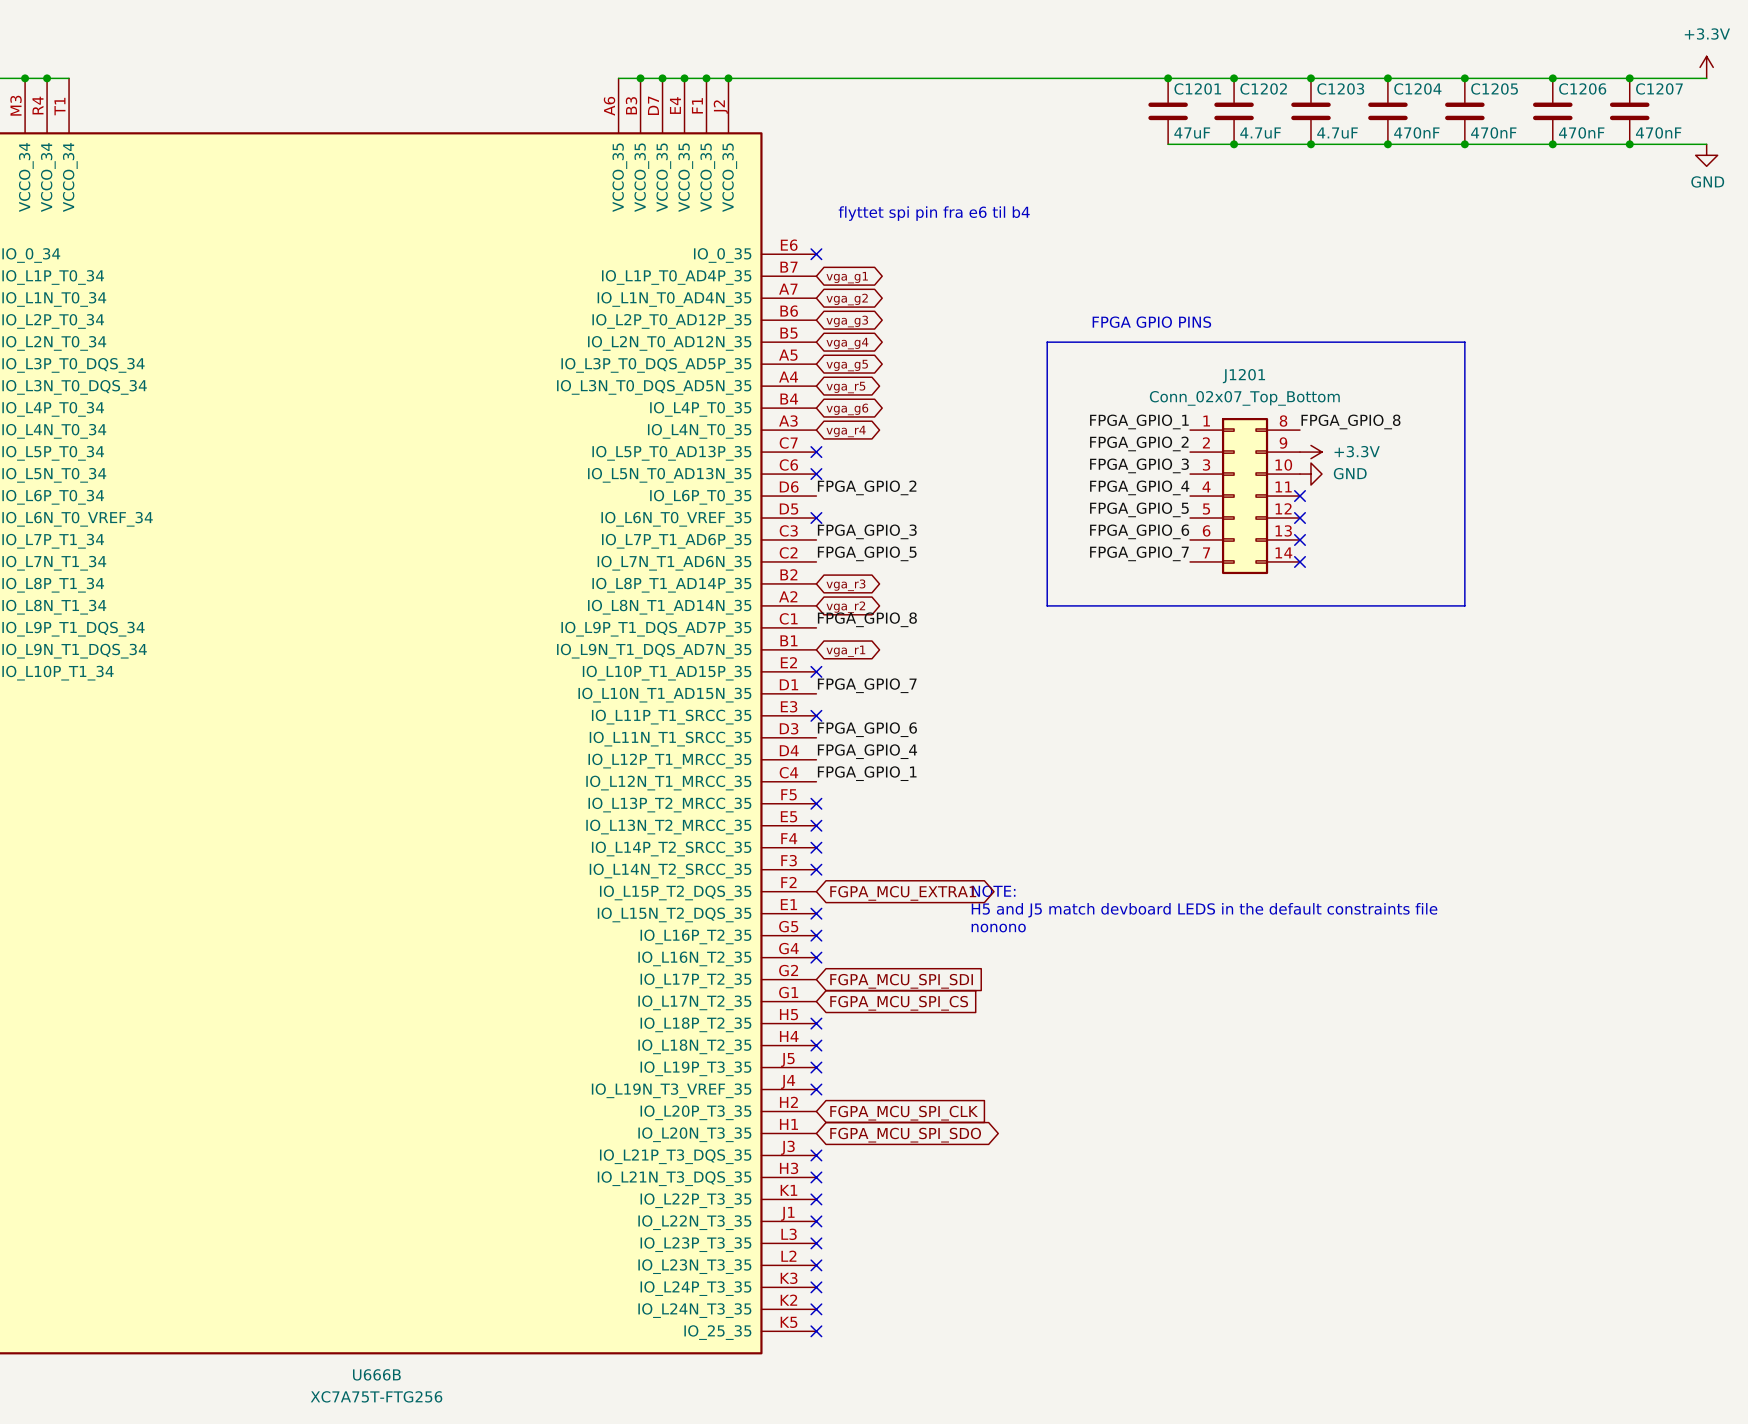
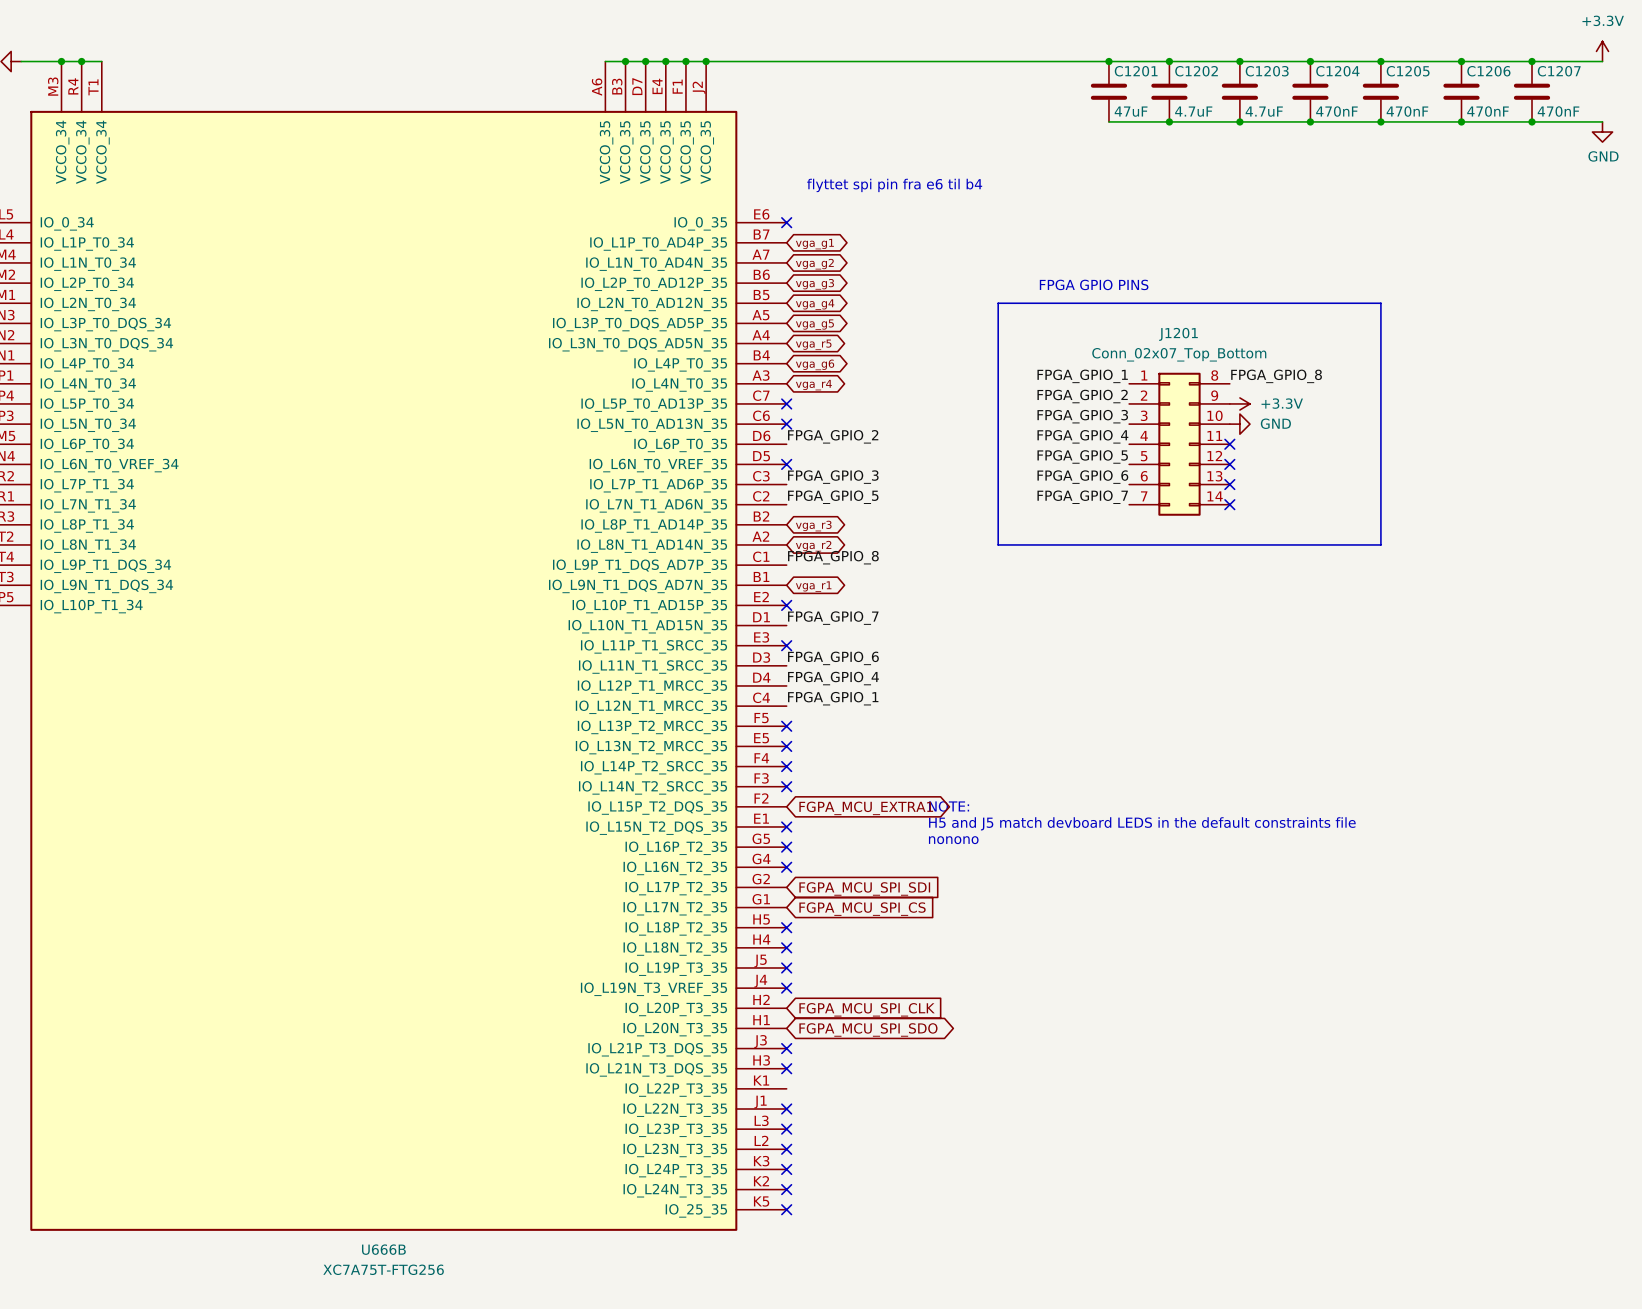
no-connect mark: (816, 1199) -> none

